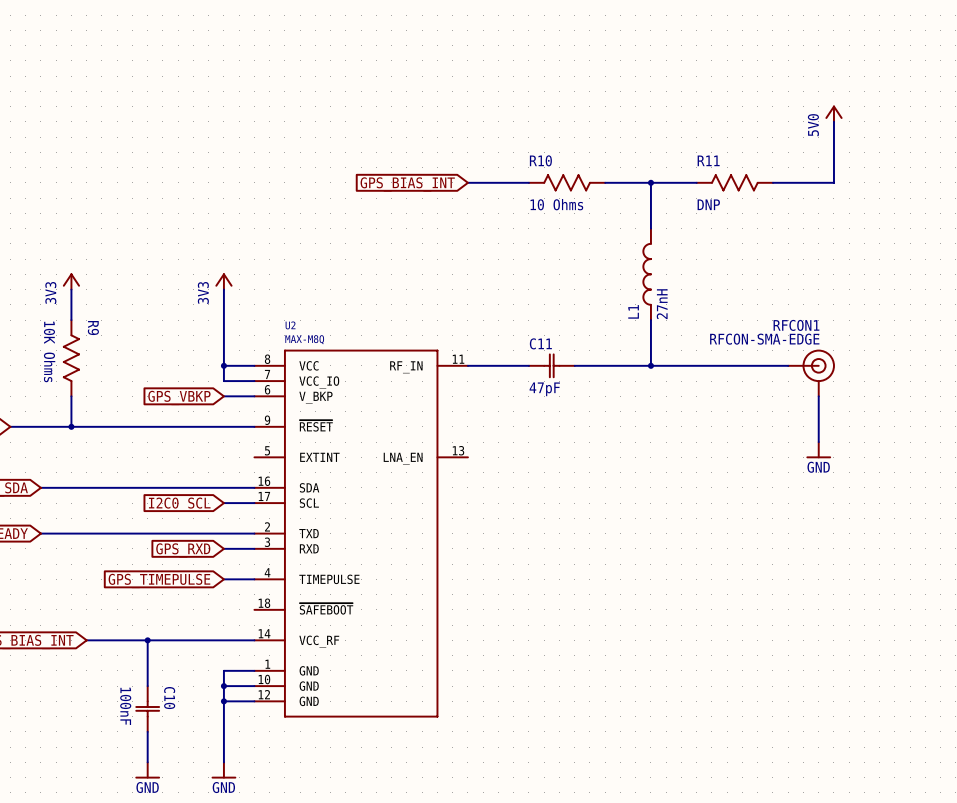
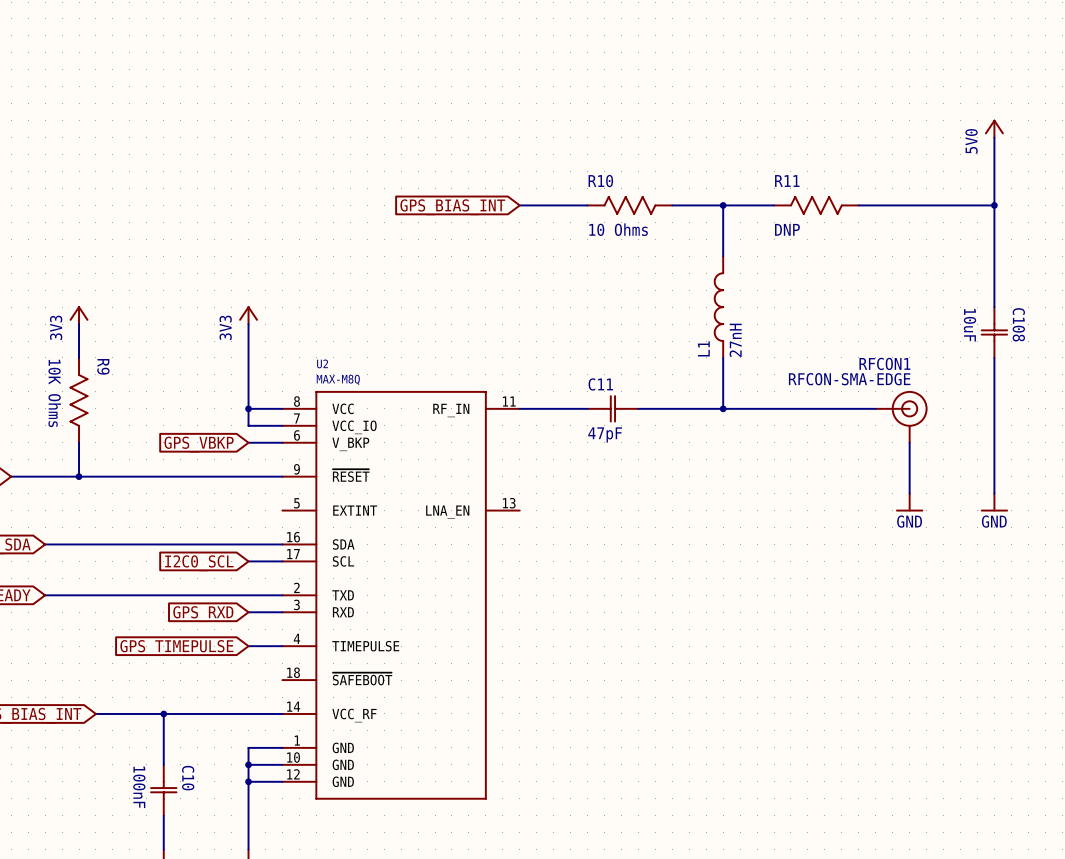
power symbol position: 5V0 (833, 113) -> 5V0 (994, 128)
wire: (833, 121) (833, 182) -> (994, 205) (926, 205)
wire: none -> (994, 137) (994, 307)
junction: none -> (994, 205)
C108: none -> 10uF (994, 332)
wire: none -> (994, 357) (994, 493)
power symbol: none -> GND (994, 502)

